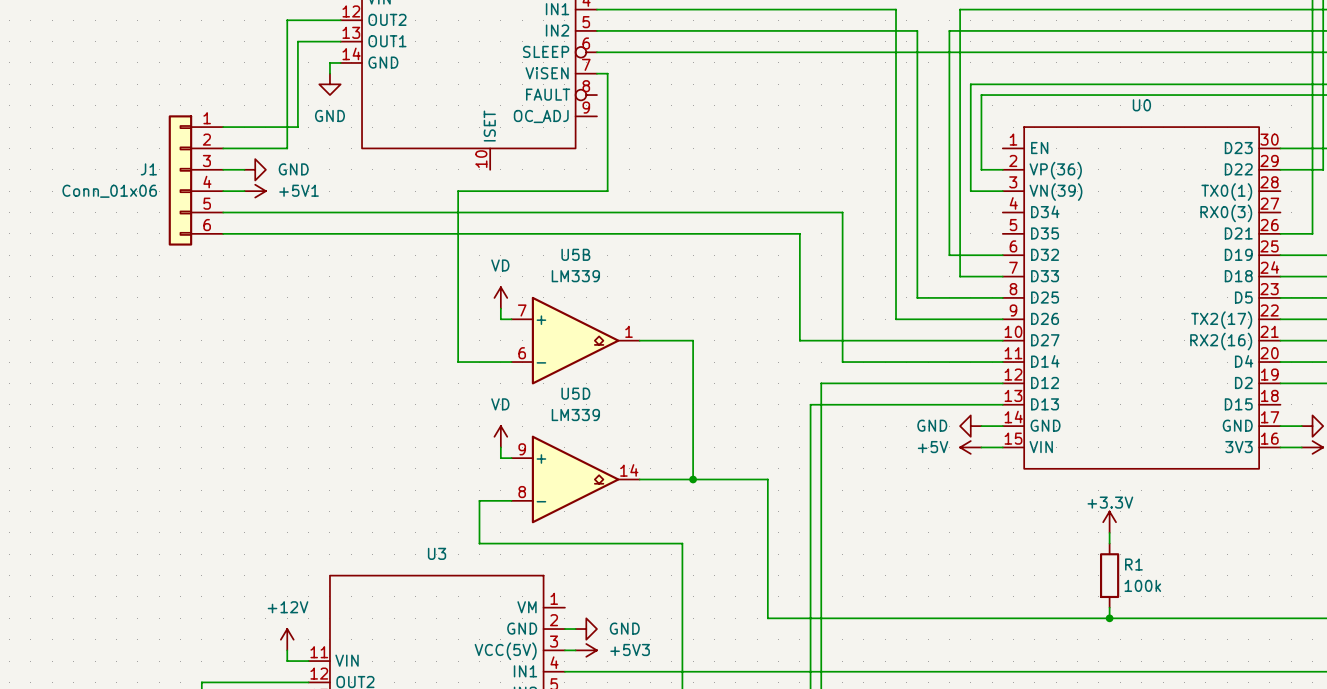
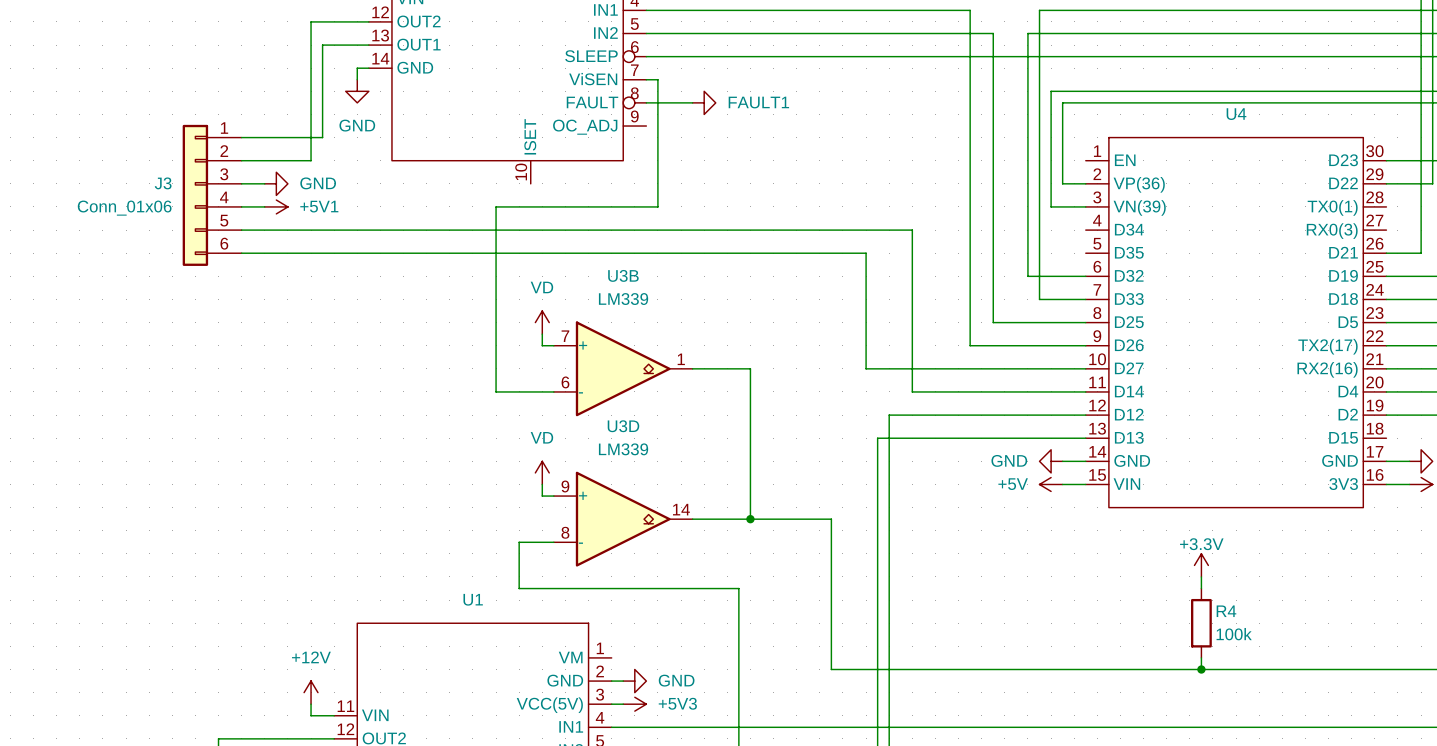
wire: none -> (646, 102) (692, 102)
power symbol: none -> FAULT1 (704, 102)
U0 name: U0 (1141, 105) -> U4 (1236, 114)
J1 name: J1 (148, 169) -> J3 (163, 183)
U5B name: U5B (575, 254) -> U3B (623, 275)
U5D name: U5D (575, 393) -> U3D (623, 426)
U3 name: U3 (437, 553) -> U1 (473, 599)
R1 name: R1 (1133, 564) -> R4 (1226, 611)

